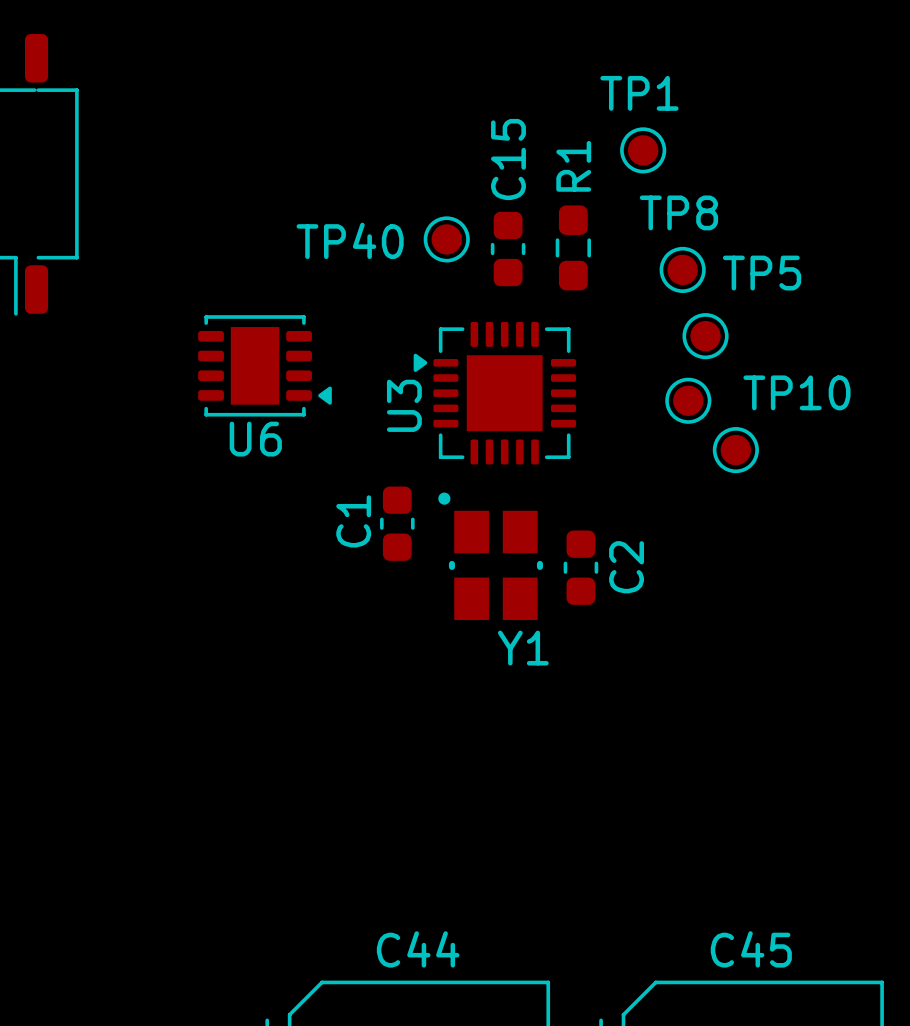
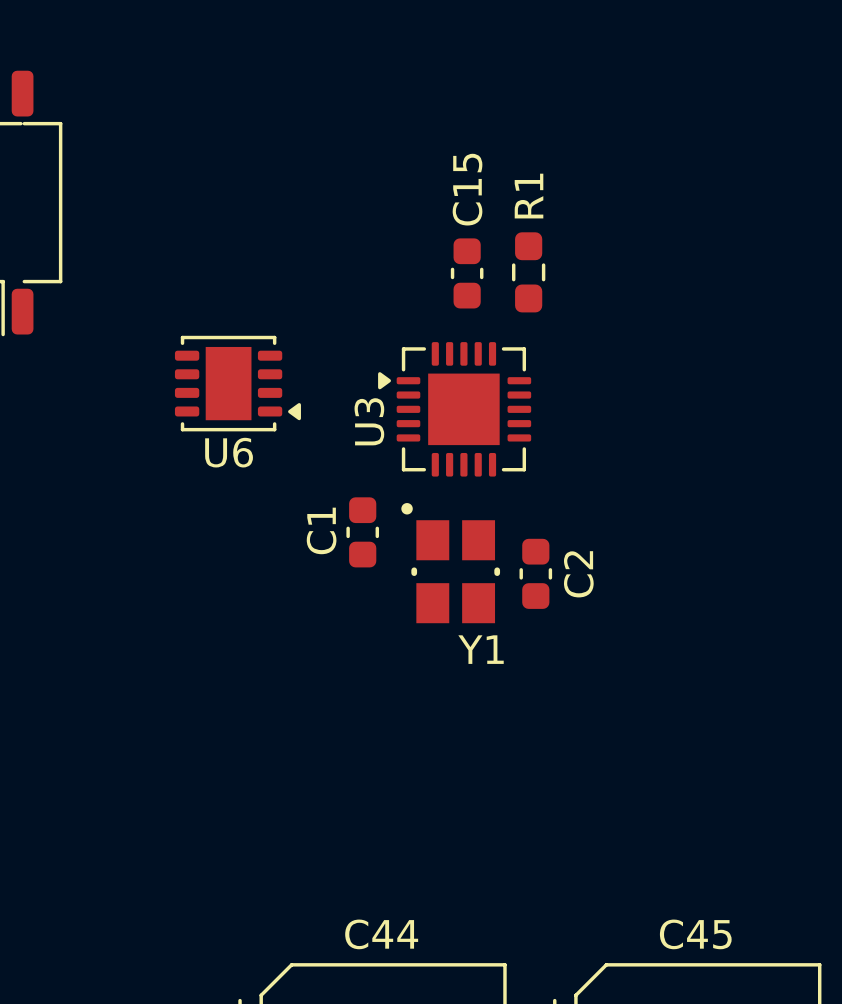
TP1: (643, 150) -> none
TP40: (446, 239) -> none
TP8: (682, 269) -> none
TP5: (705, 336) -> none
part: (688, 400) -> none
TP10: (735, 450) -> none

